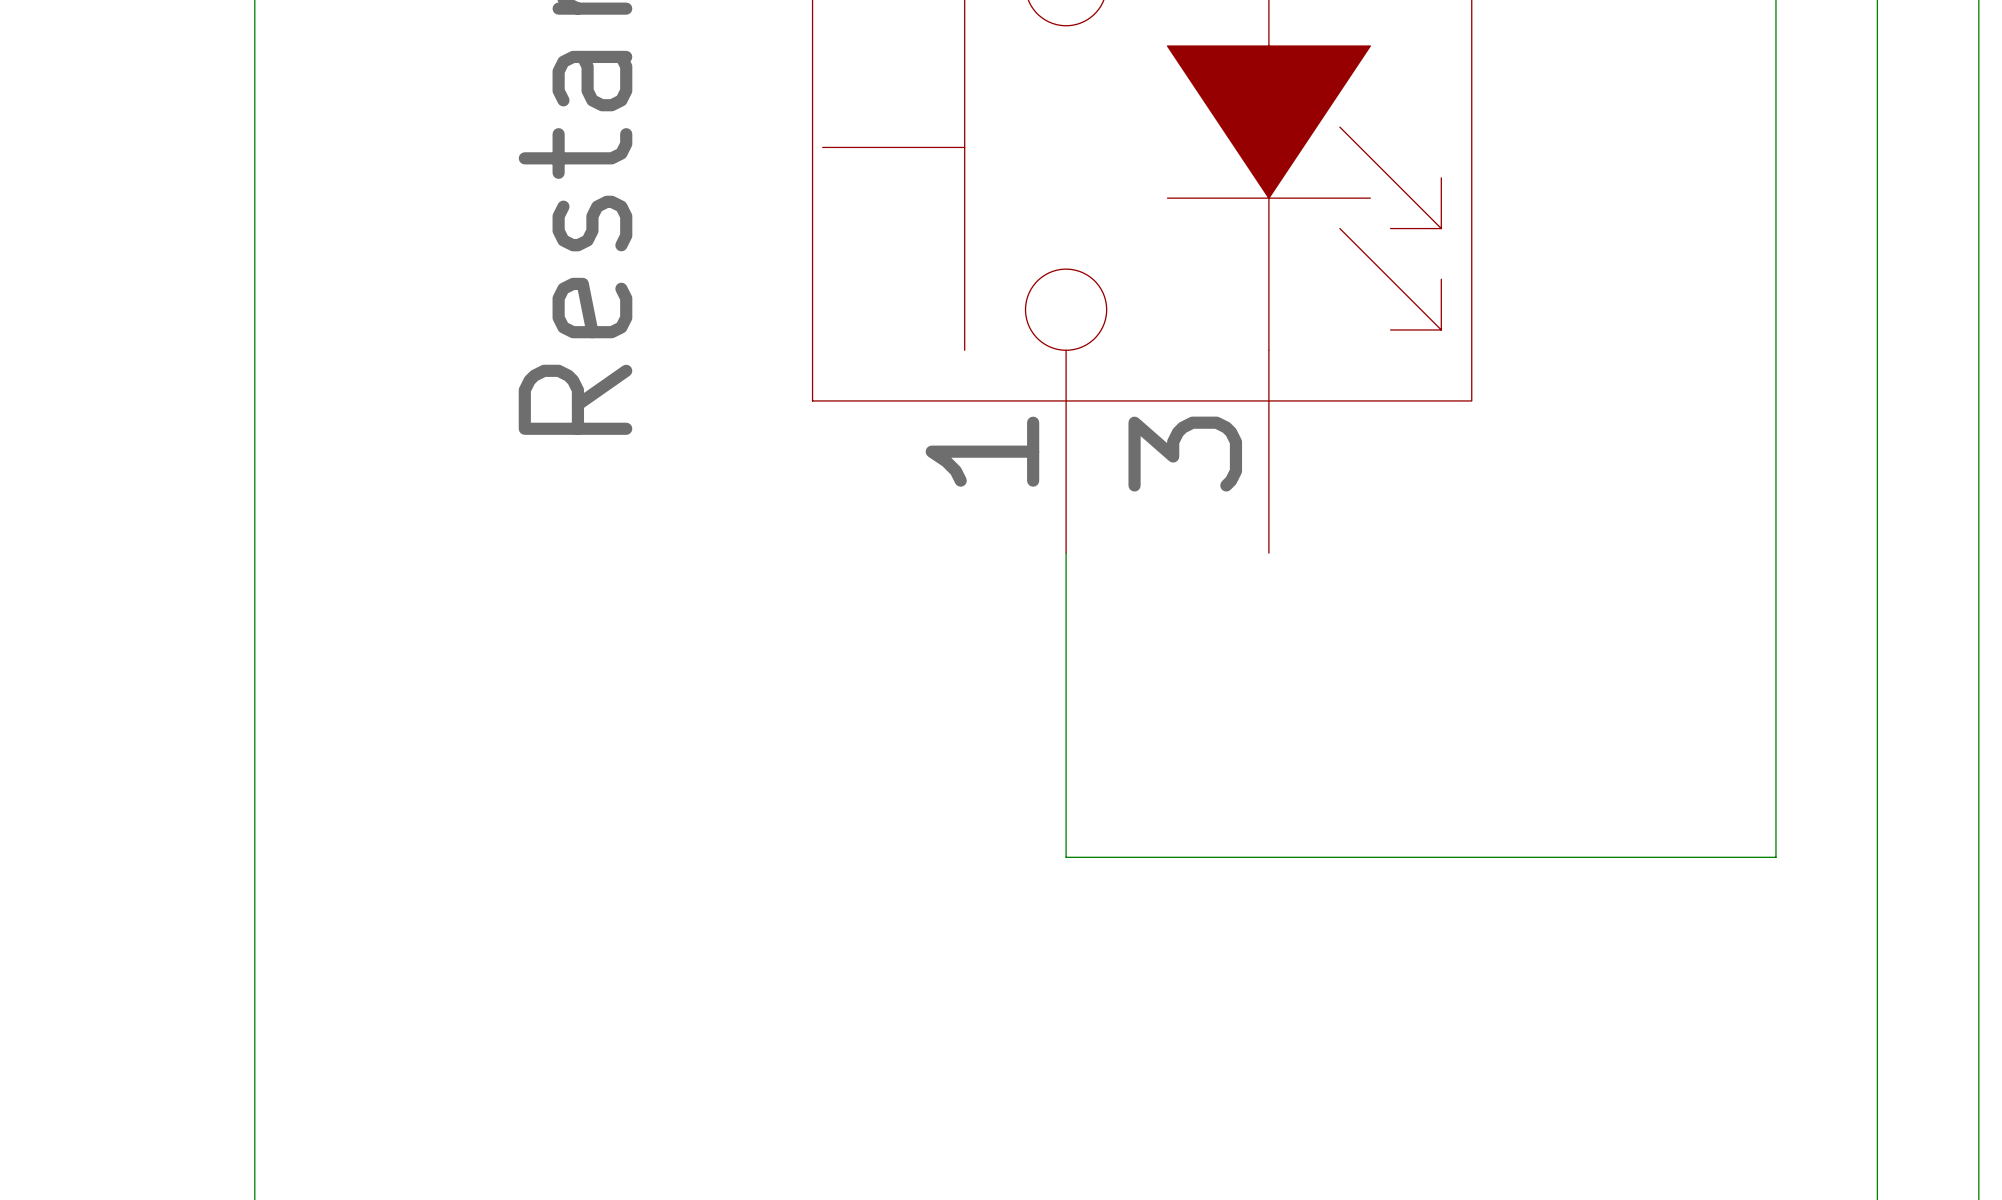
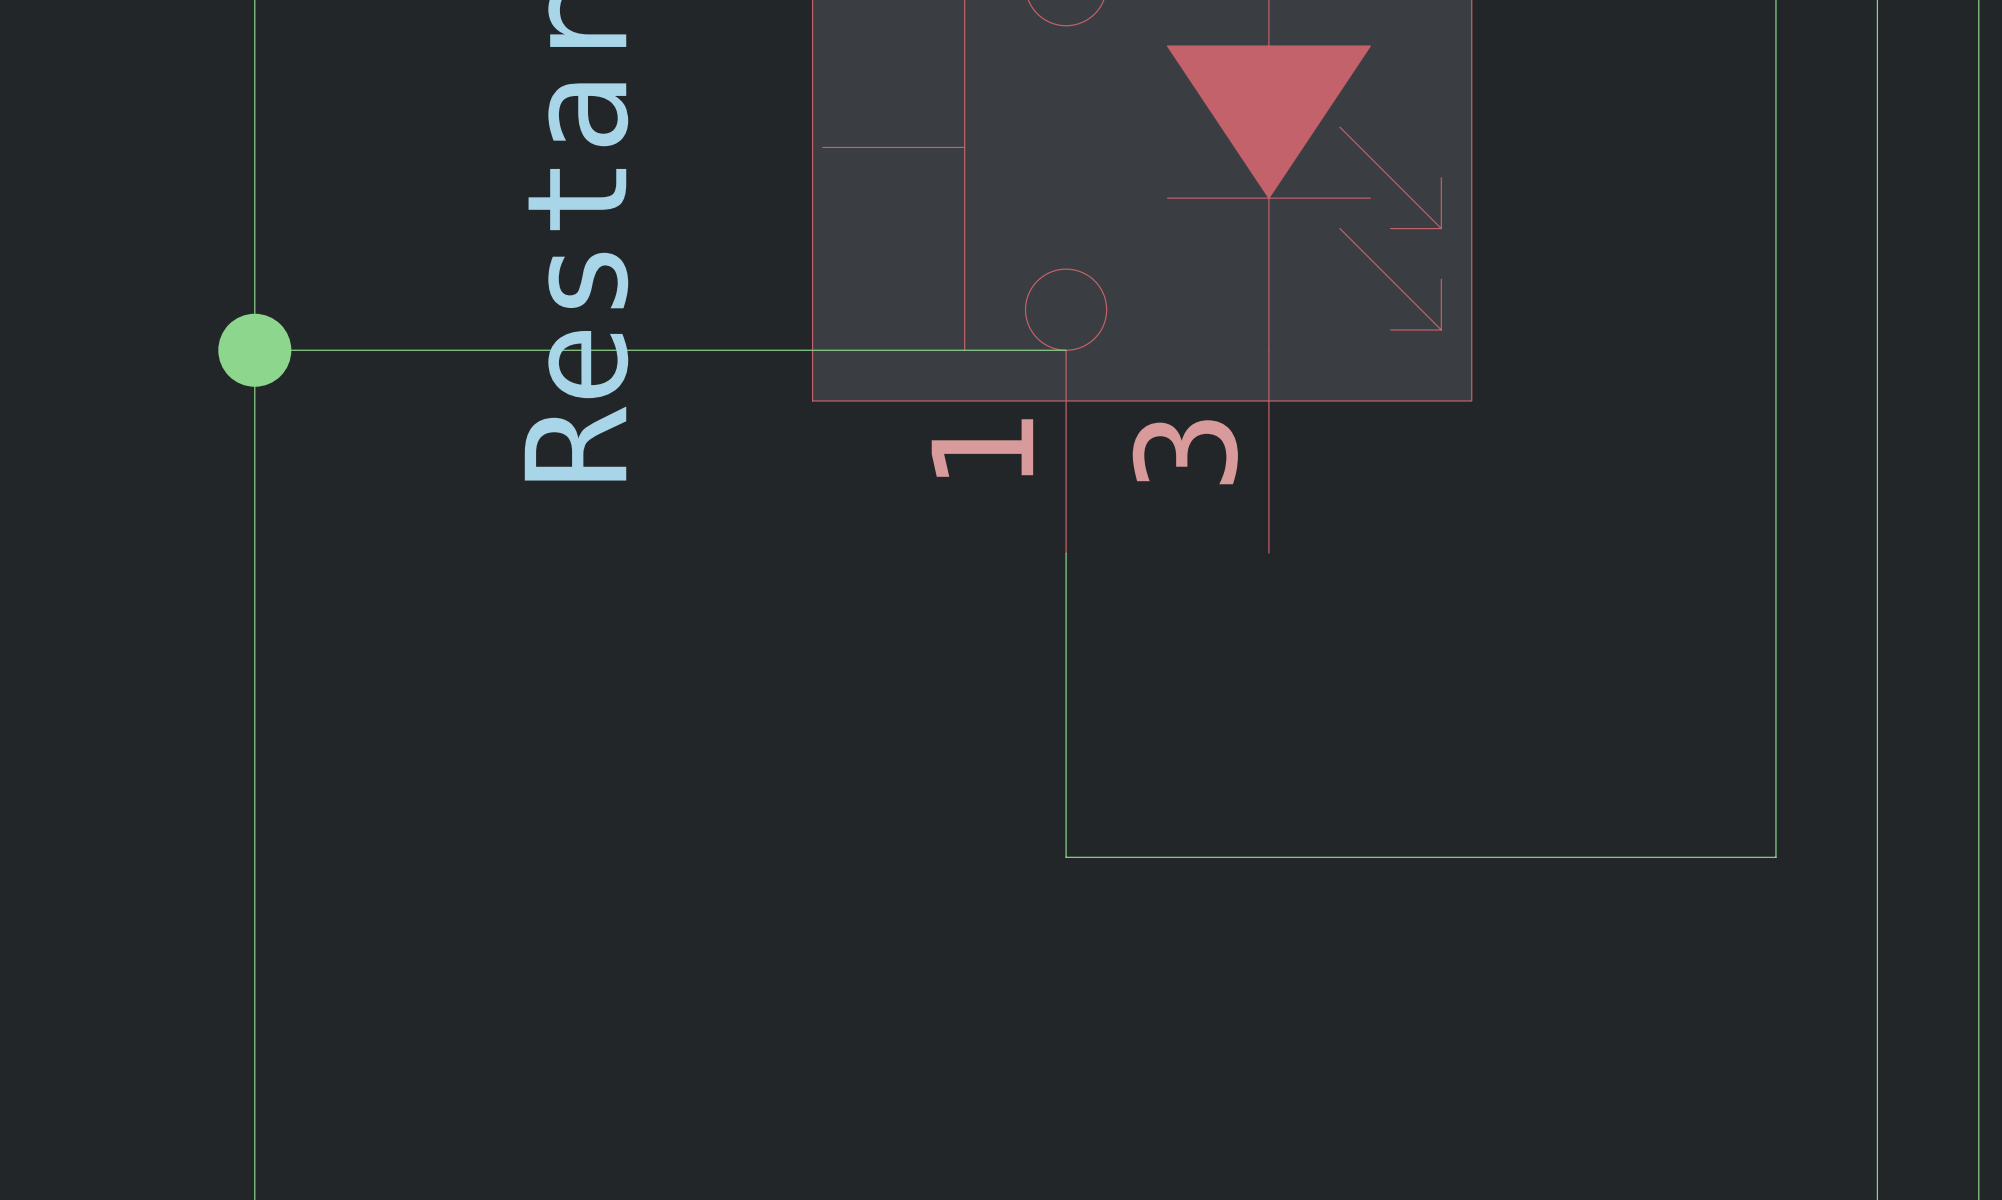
wire: none -> (254, 350) (1066, 350)
junction: none -> (254, 350)

